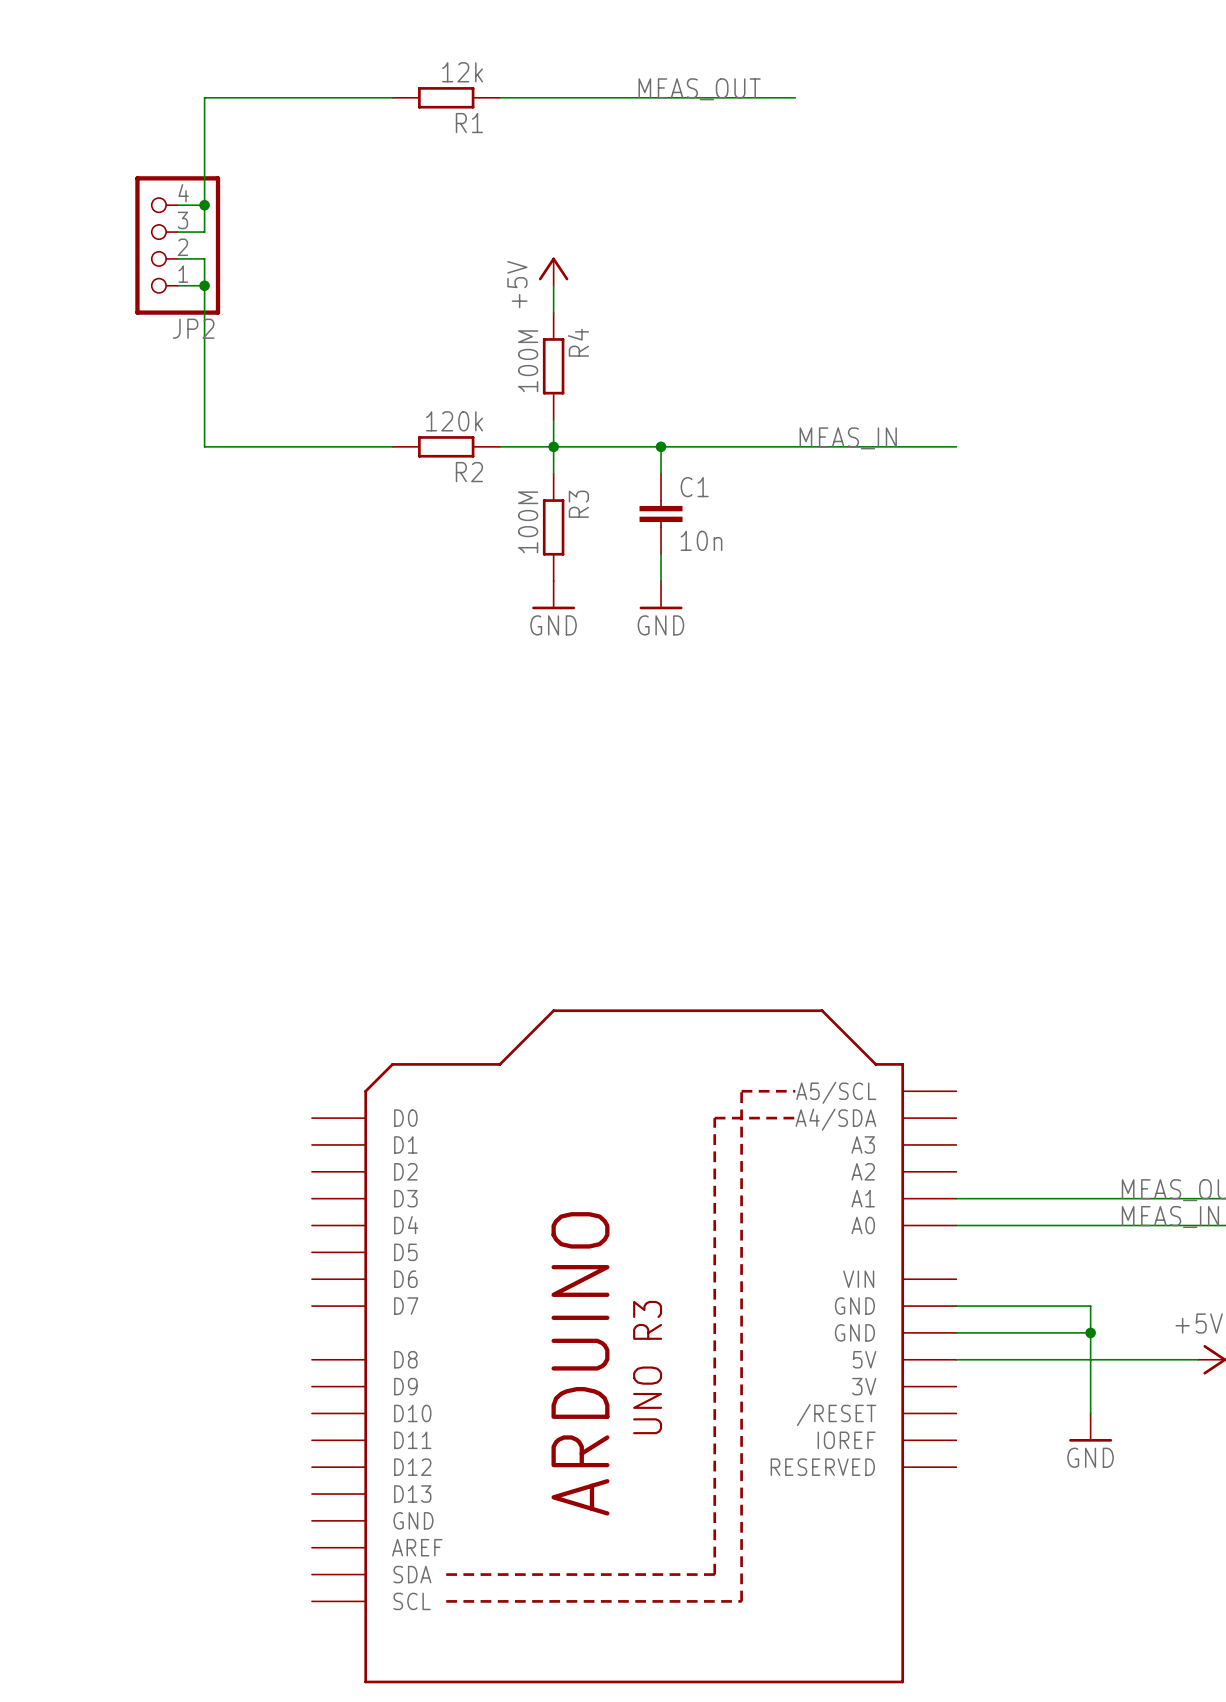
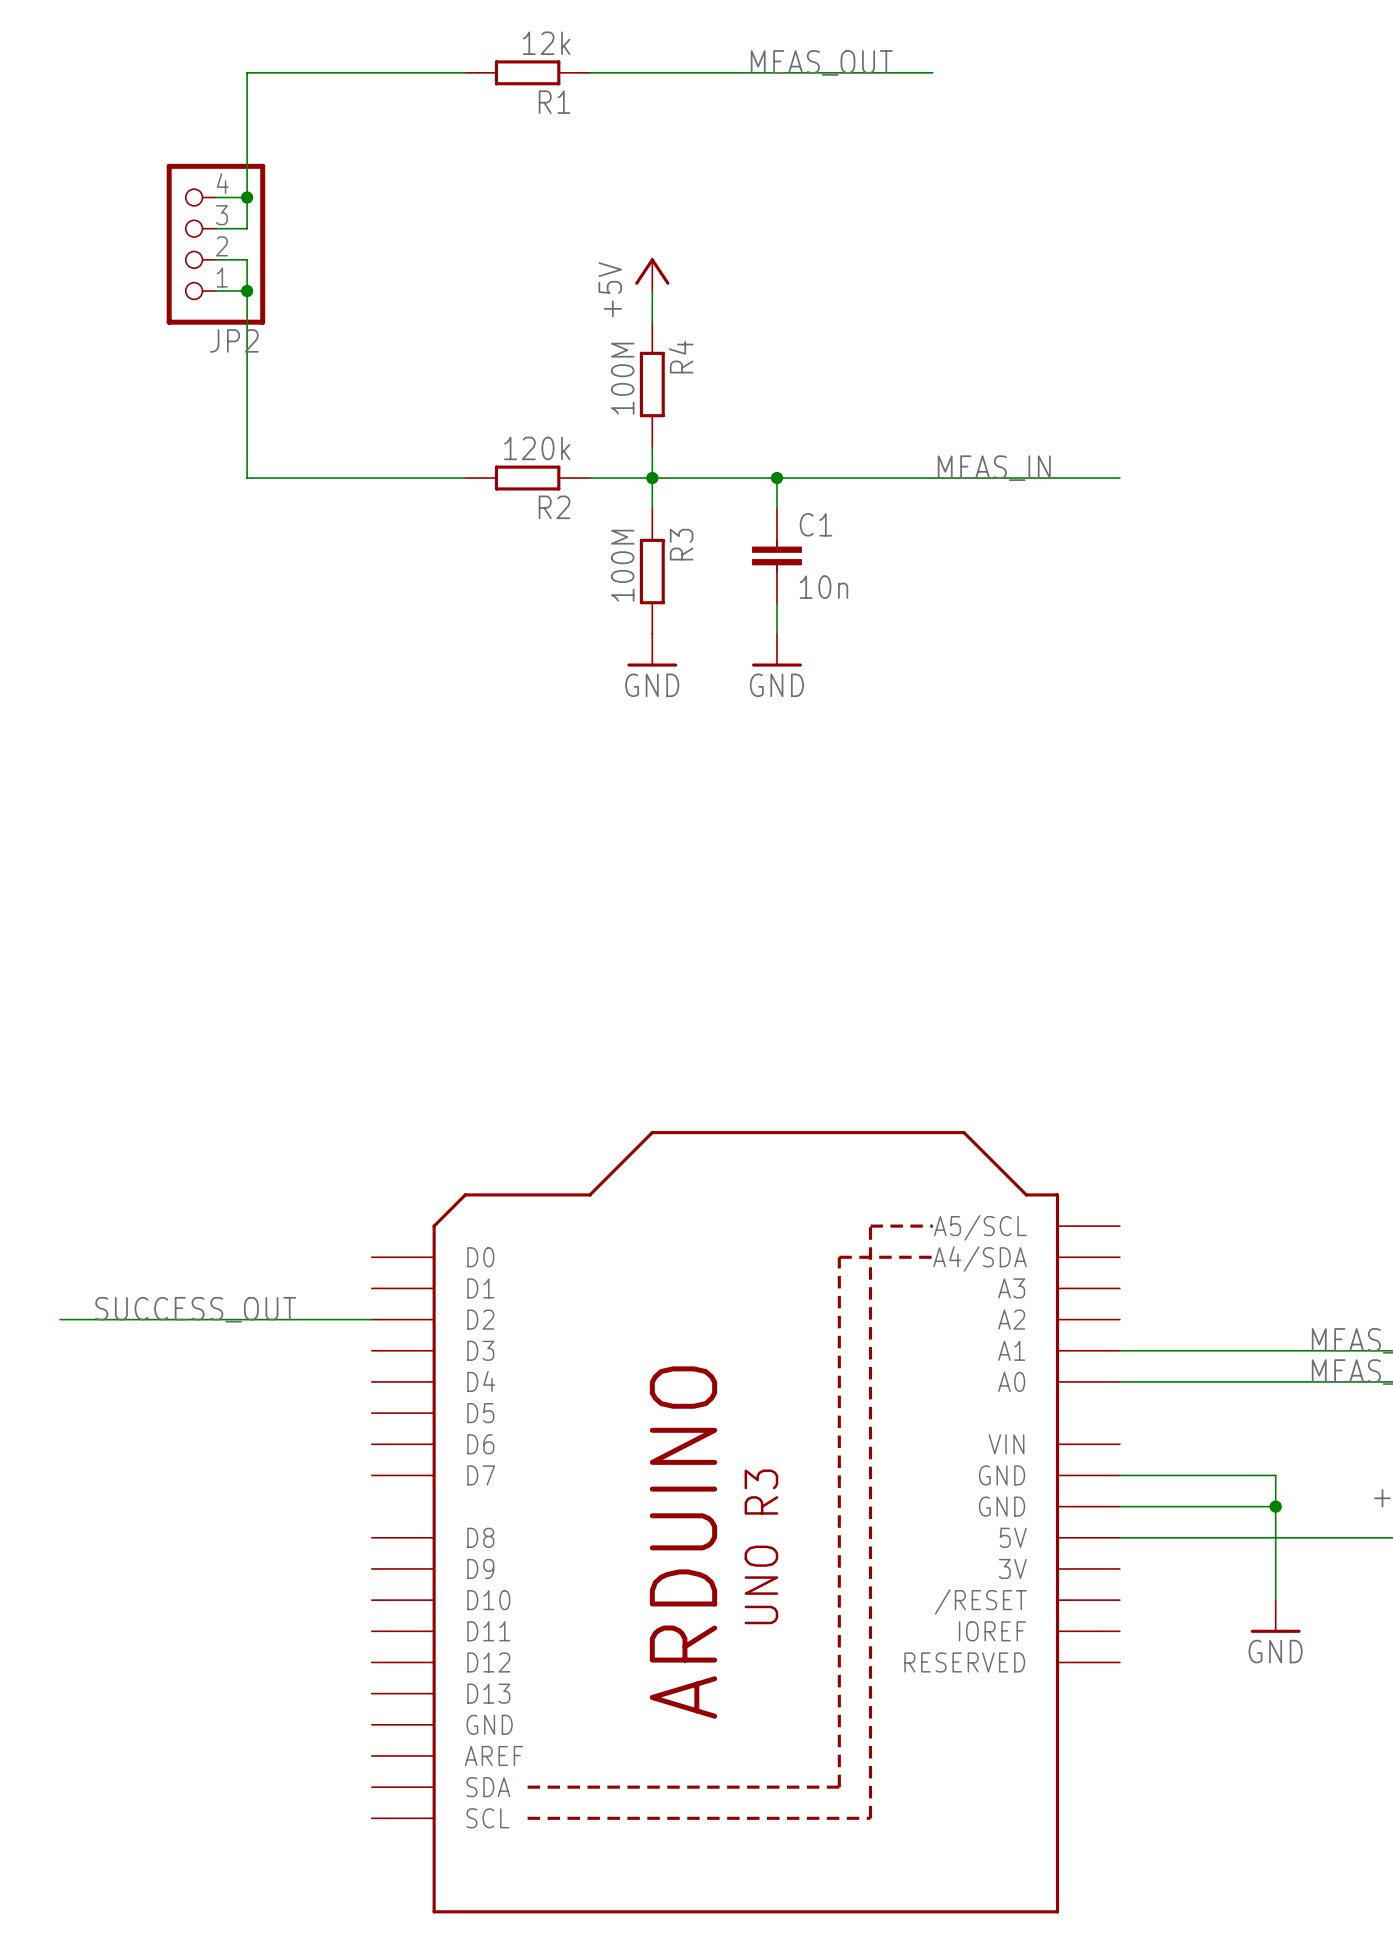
label: none -> SUCCESS_OUT (195, 1309)
wire: none -> (60, 1319) (371, 1319)

